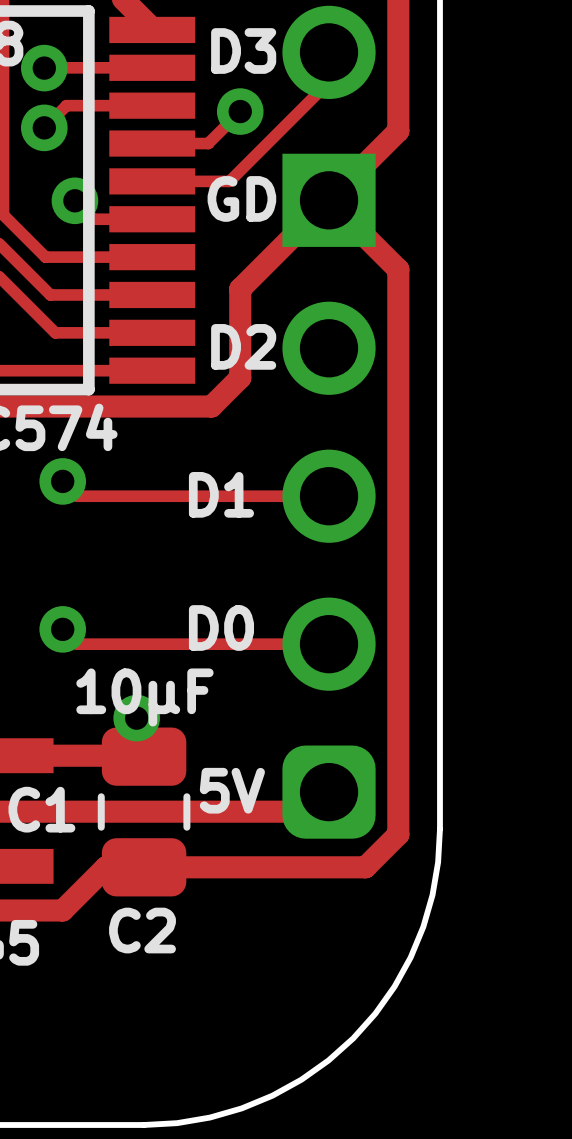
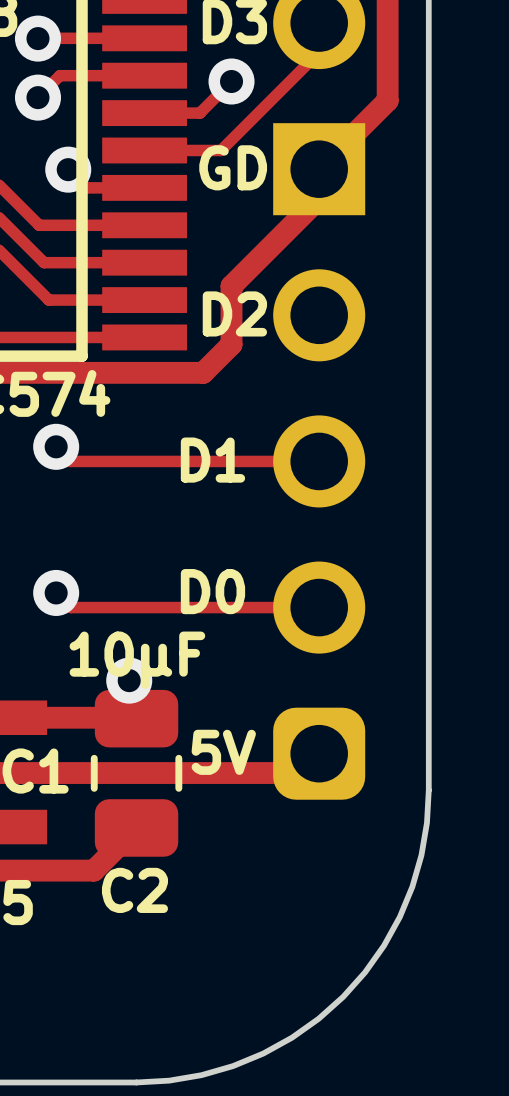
track: none -> (319, 198) (231, 286)
track: (240, 318) (240, 289) (329, 200) (398, 269) (398, 834) (365, 867) (105, 867) (62, 910) -> (136, 827) (93, 870) (56, 870)

